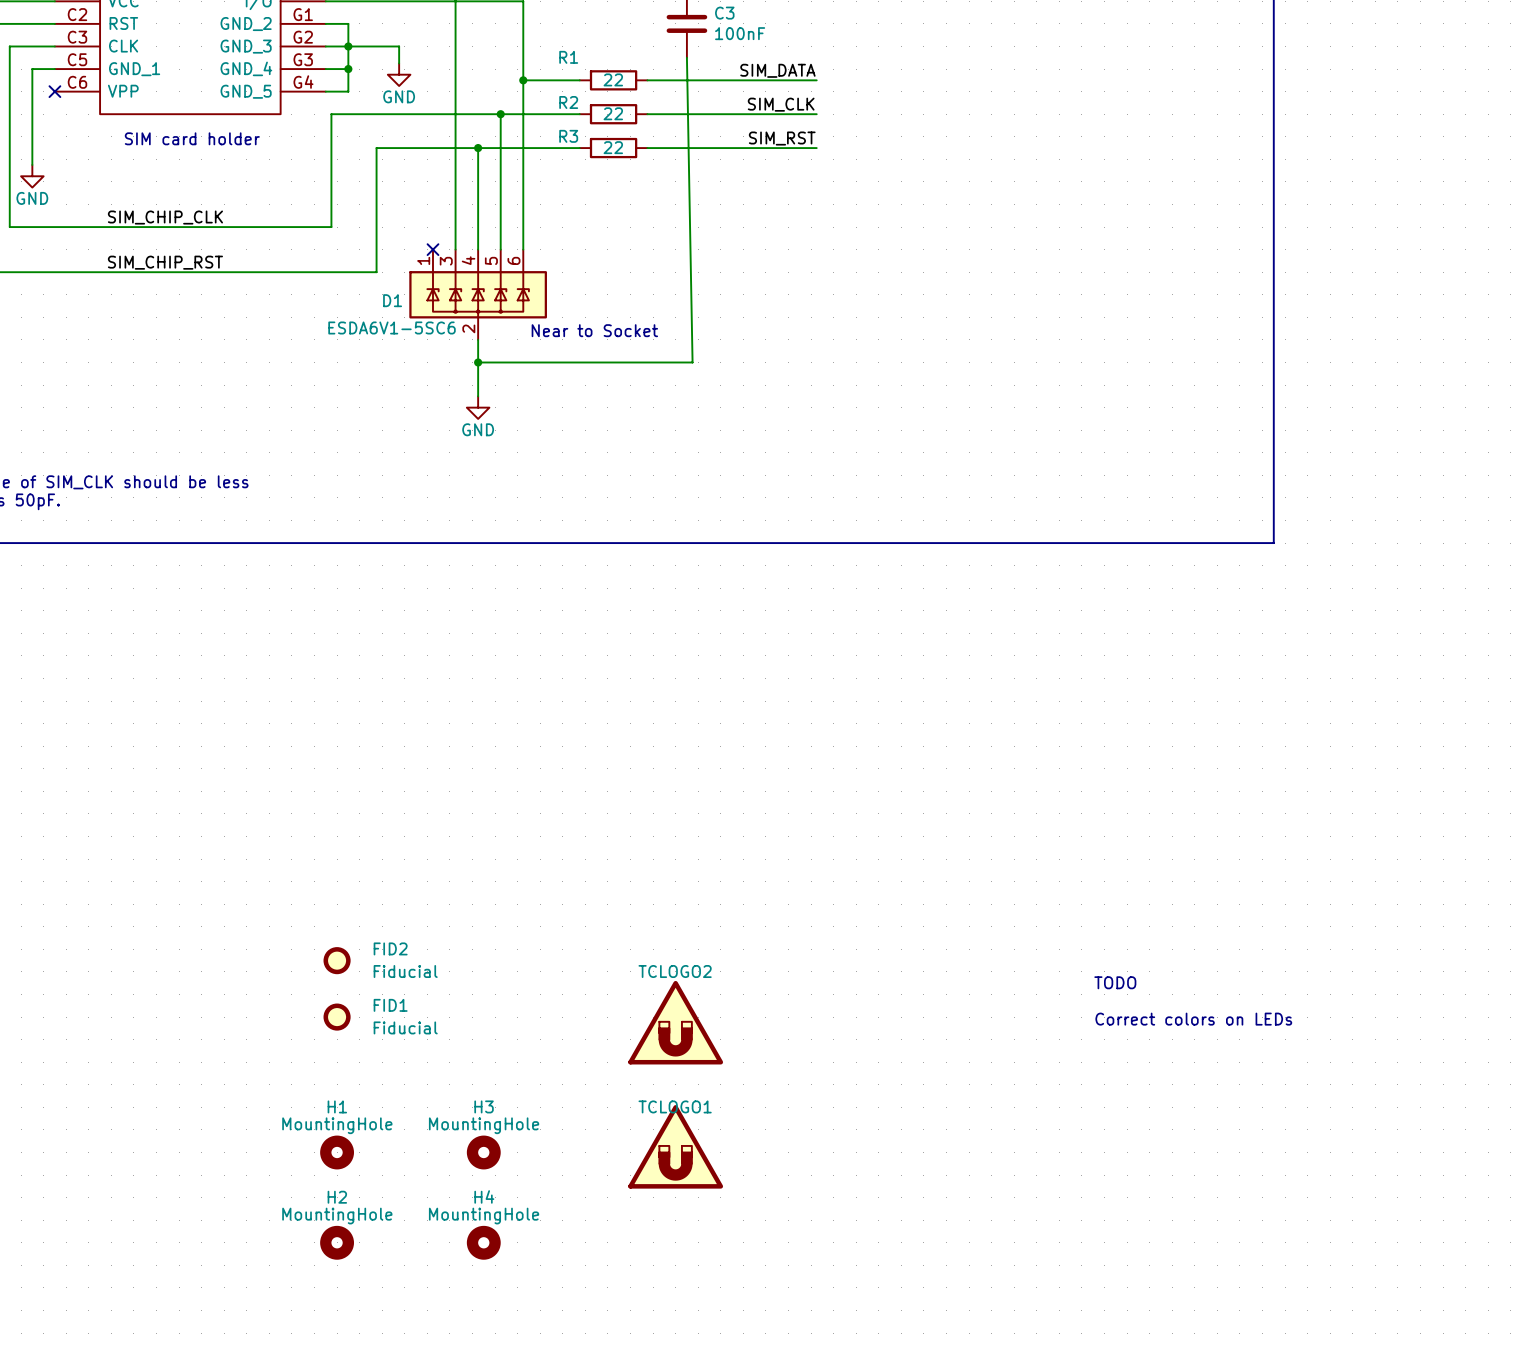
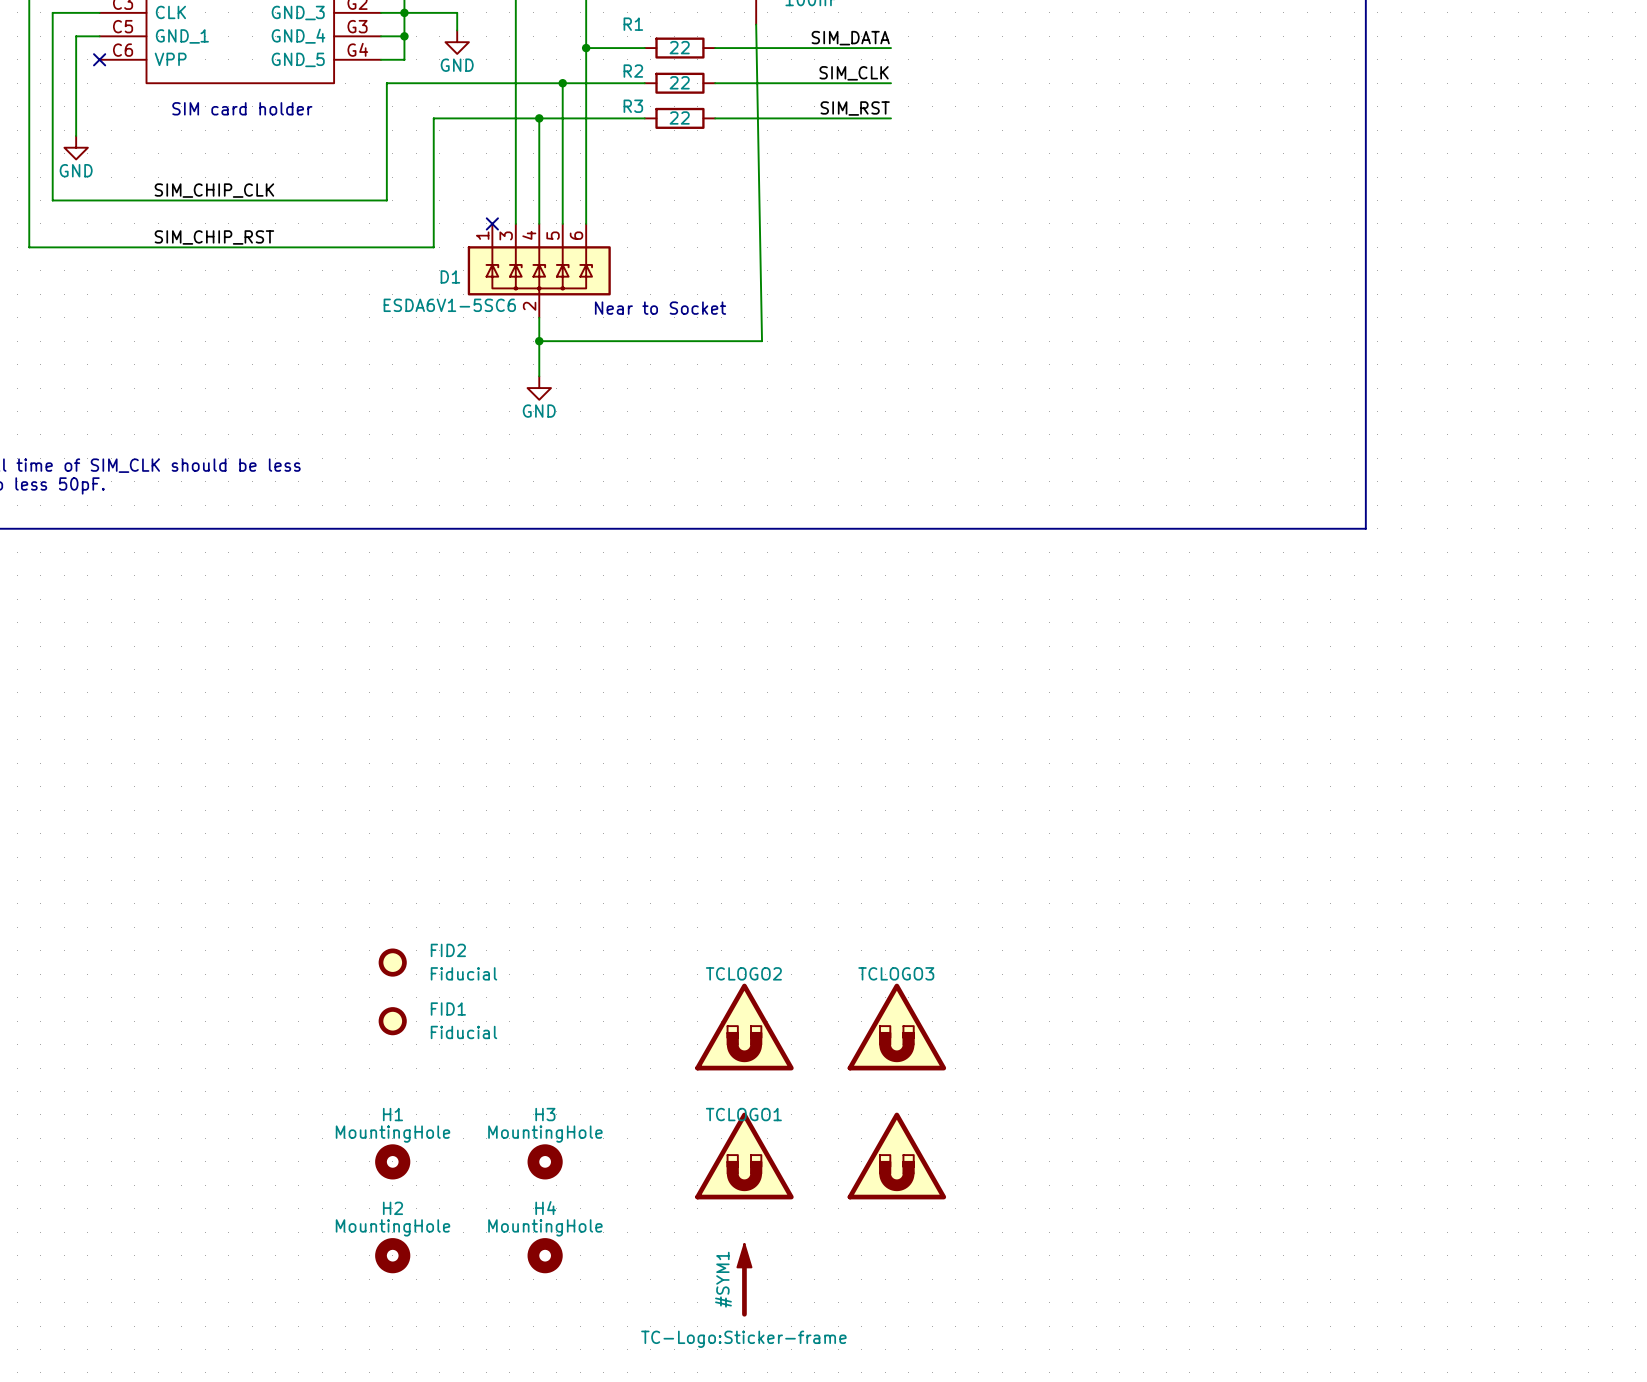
text: TODO (1115, 982) -> none
text: Correct colors on LEDs (1193, 1019) -> none
TCLOGO3: none -> (896, 1027)
part: none -> (896, 1156)
#SYM1: none -> (744, 1280)

